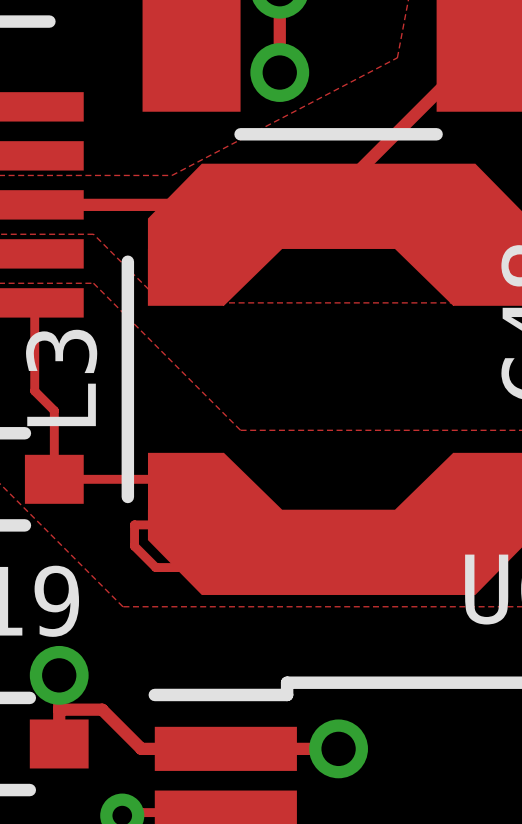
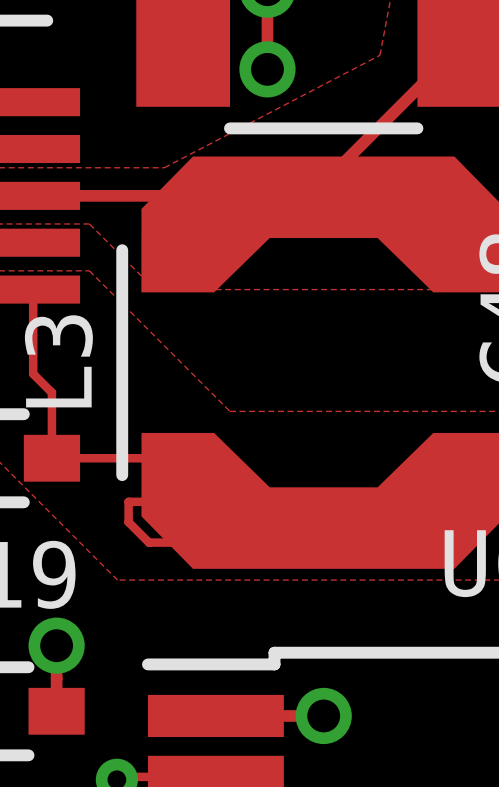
top track: (59, 709) (102, 709) (141, 748) (225, 748) -> none

